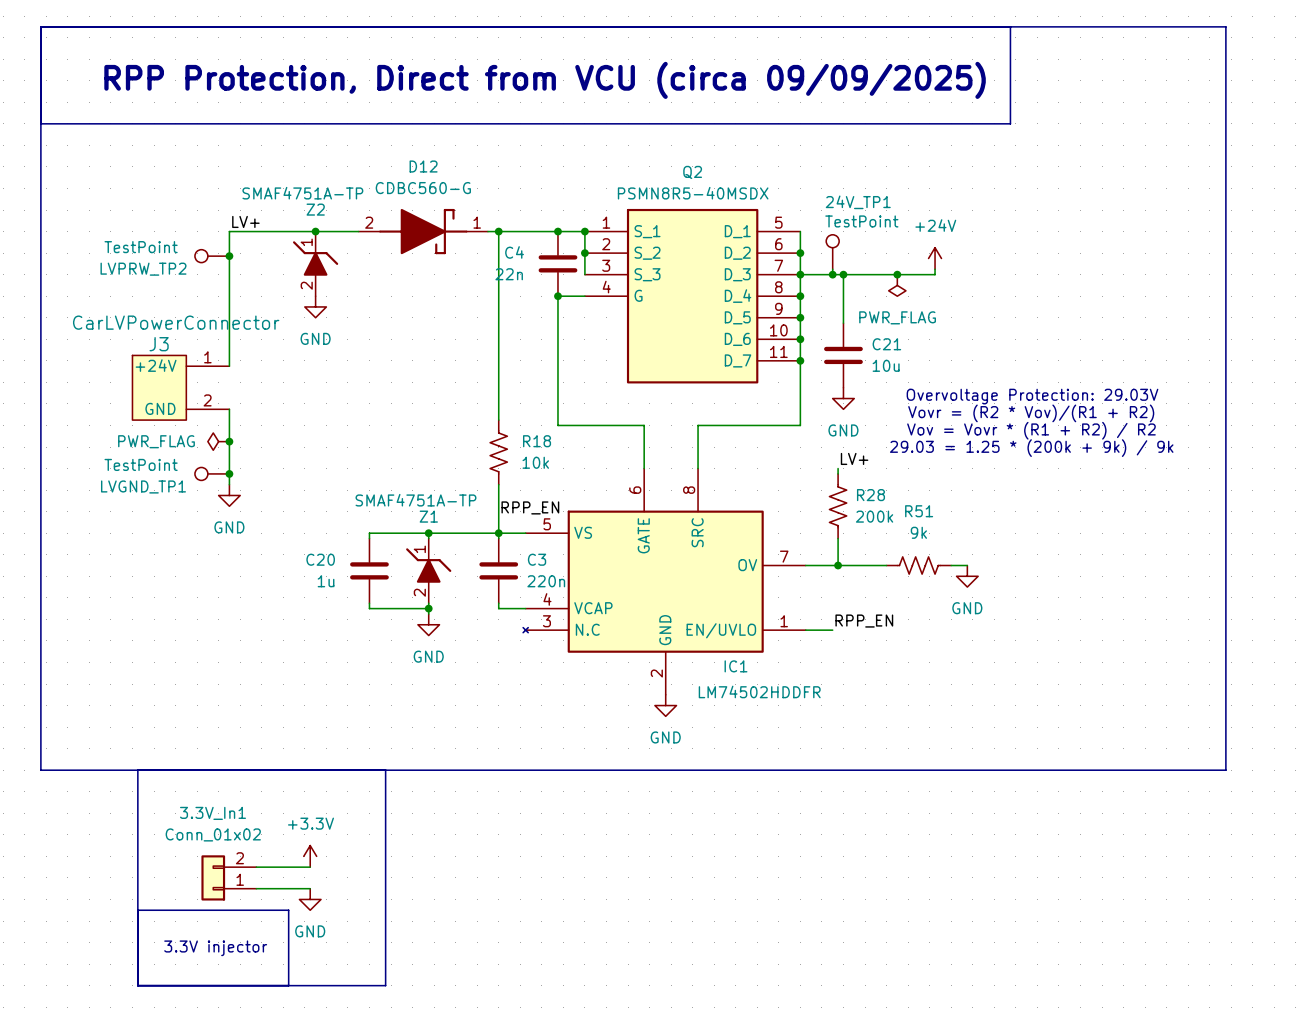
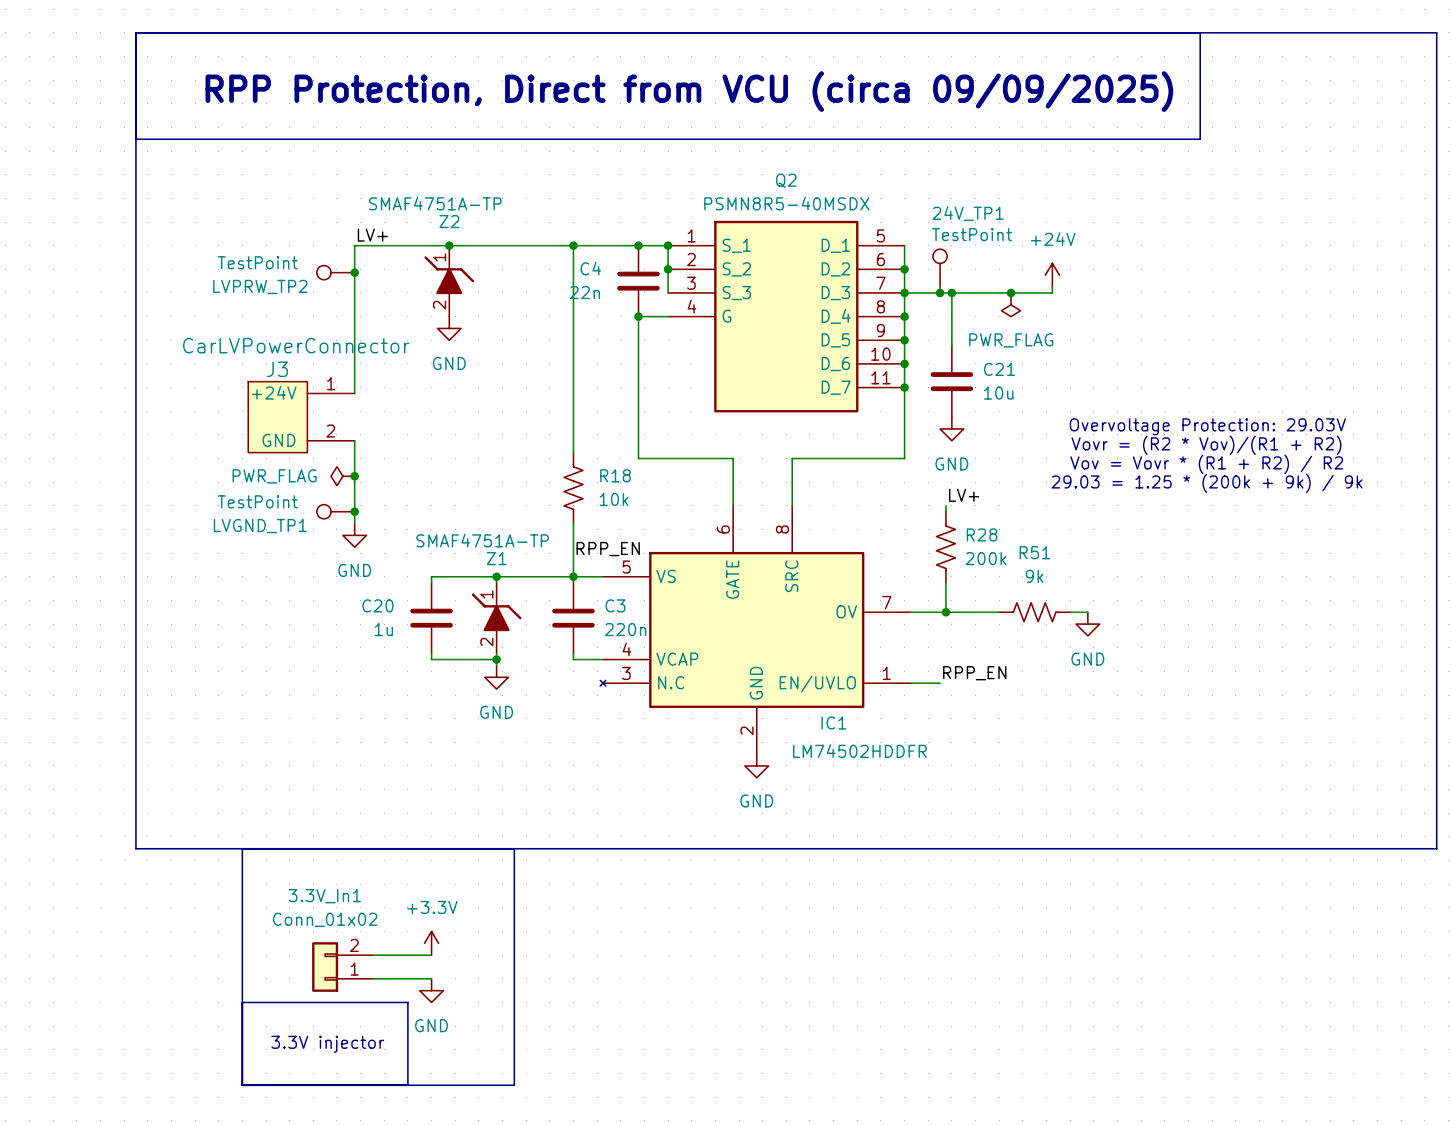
line: (40, 26) (1225, 26) (1225, 770) (40, 770) (40, 26) -> (135, 32) (1436, 32) (1436, 848) (135, 848) (135, 32)
line: (1010, 26) (1010, 123) (40, 123) -> (1200, 32) (1200, 139) (135, 139)
text position: RPP Protection, Direct from VCU (circa 09/09/2025) (545, 80) -> RPP Protection, Direct from VCU (circa 09/09/2025) (689, 91)
label position: LV+ (245, 221) -> LV+ (372, 235)
wire: (299, 231) (229, 231) (229, 366) -> (354, 245) (354, 393)
junction position: (315, 231) -> (354, 272)
junction: none -> (449, 245)
D12: CDBC560-G (423, 231) -> none
LVPRW_TP2 position: (212, 256) -> (335, 272)
junction: (229, 256) -> none
Z2 position: (315, 263) -> (449, 281)
power symbol position: GND (315, 306) -> GND (449, 328)
J3 position: (180, 387) -> (301, 417)
text position: Overvoltage Protection: 29.03V (1032, 396) -> Overvoltage Protection: 29.03V (1207, 426)
wire: (229, 409) (229, 484) -> (354, 440) (354, 523)
text position: Vovr = (R2 * Vov)/(R1 + R2) (1031, 413) -> Vovr = (R2 * Vov)/(R1 + R2) (1206, 445)
text position: Vov = Vovr * (R1 + R2) / R2 (1031, 430) -> Vov = Vovr * (R1 + R2) / R2 (1206, 464)
power symbol position: PWR_FLAG (218, 441) -> PWR_FLAG (342, 476)
junction: (229, 441) -> none
junction: none -> (354, 476)
text position: 29.03 = 1.25 * (200k + 9k) / 9k (1031, 448) -> 29.03 = 1.25 * (200k + 9k) / 9k (1207, 483)
LVGND_TP1 position: (212, 473) -> (335, 511)
junction: (229, 473) -> none
junction: none -> (354, 511)
power symbol position: GND (229, 495) -> GND (354, 535)
line: (137, 770) (137, 985) (385, 985) (385, 770) -> (242, 848) (242, 1085) (514, 1085) (514, 848)
power symbol position: +3.3V (310, 856) -> +3.3V (431, 943)
wire: (256, 867) (310, 867) -> (372, 955) (431, 955)
3.3V_In1 position: (228, 877) -> (342, 967)
wire: (256, 888) (310, 888) -> (372, 978) (431, 978)
power symbol position: GND (310, 899) -> GND (431, 990)
line: (137, 910) (288, 910) (288, 985) -> (242, 1002) (407, 1002) (407, 1085)
text position: 3.3V injector (215, 948) -> 3.3V injector (327, 1044)

